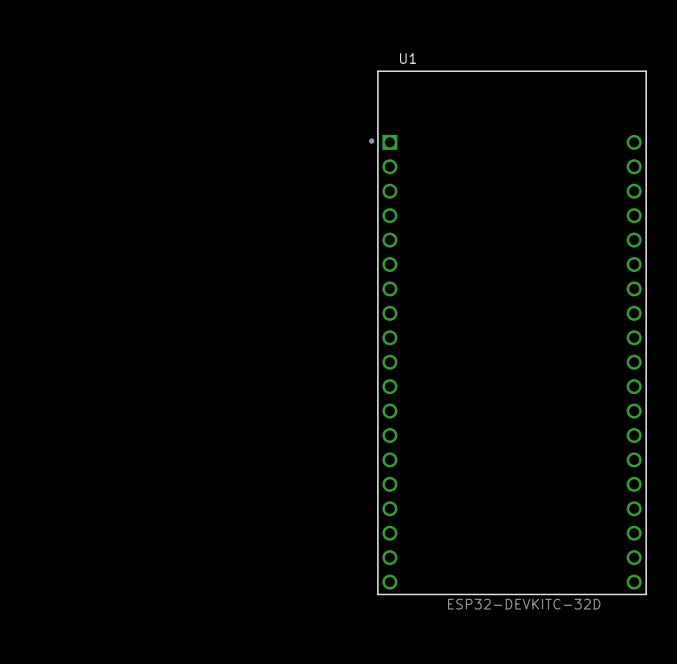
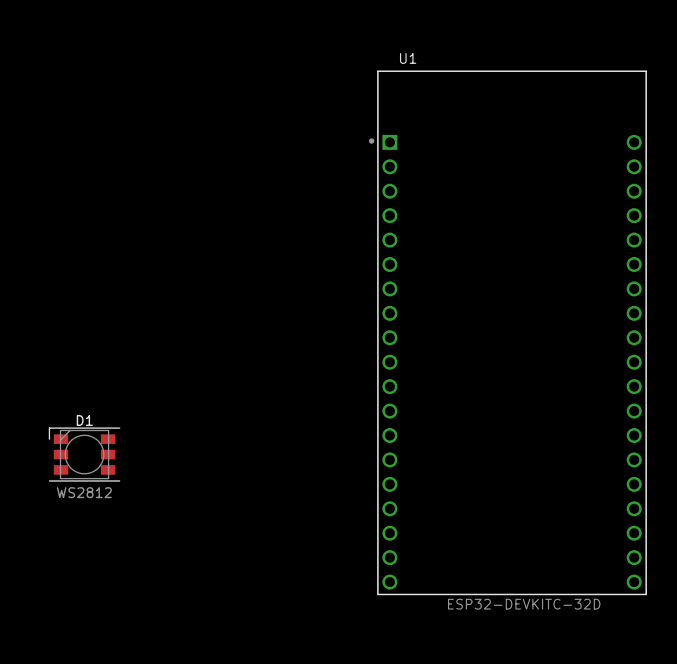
D1: none -> WS2812 (84, 454)

